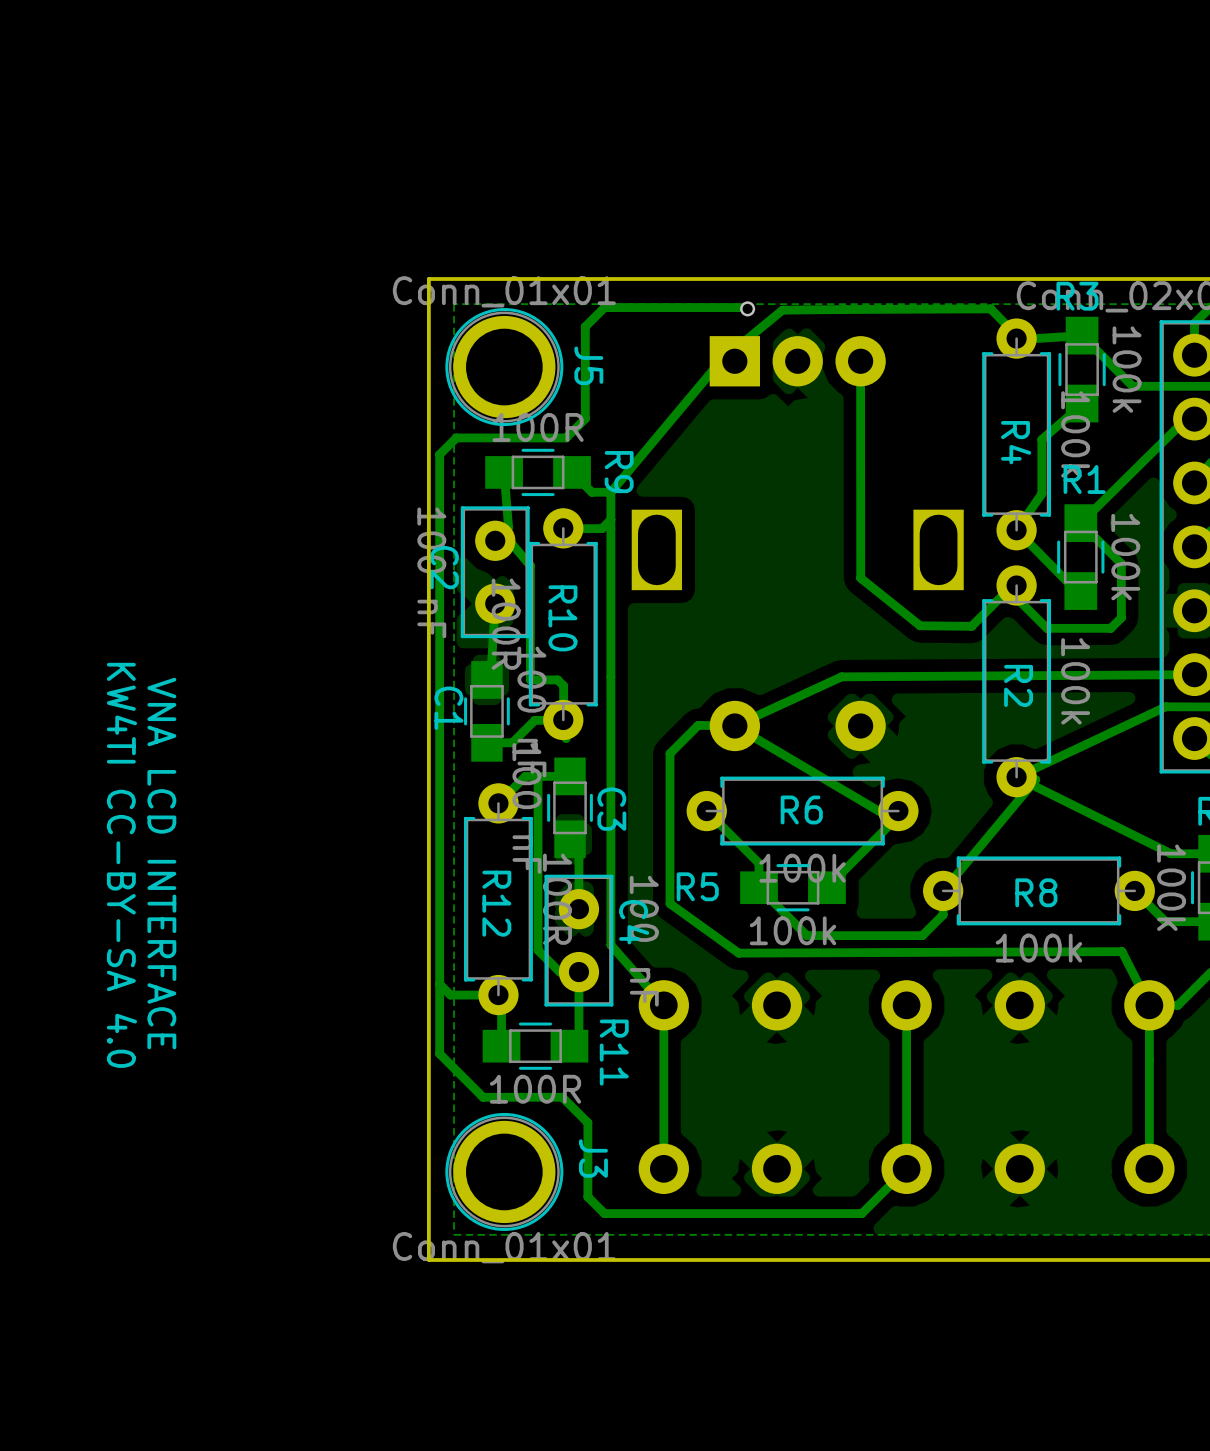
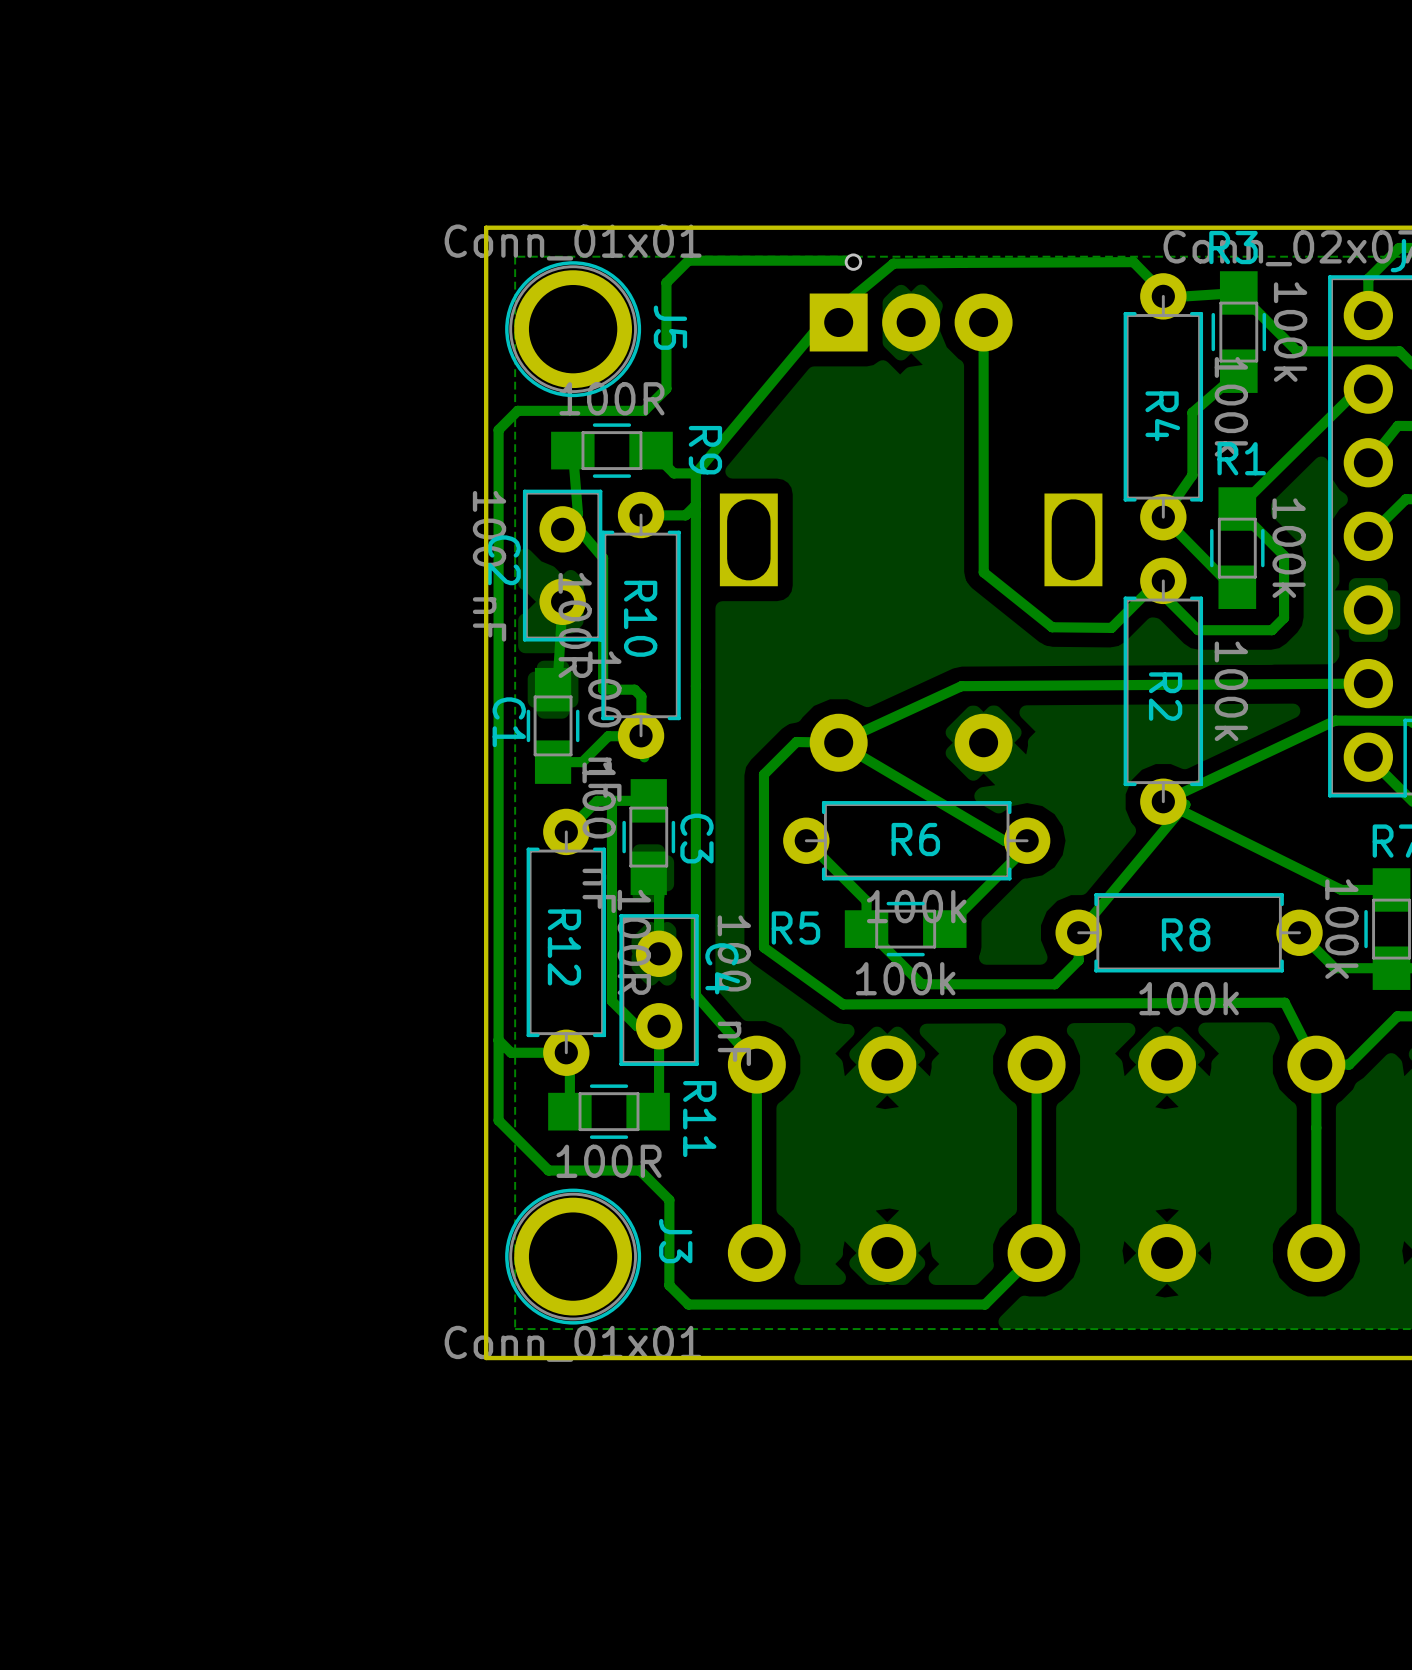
text: VNA LCD INTERFACE (161, 863) -> none
text: KW4TI CC-BY-SA 4.0 (121, 865) -> none

